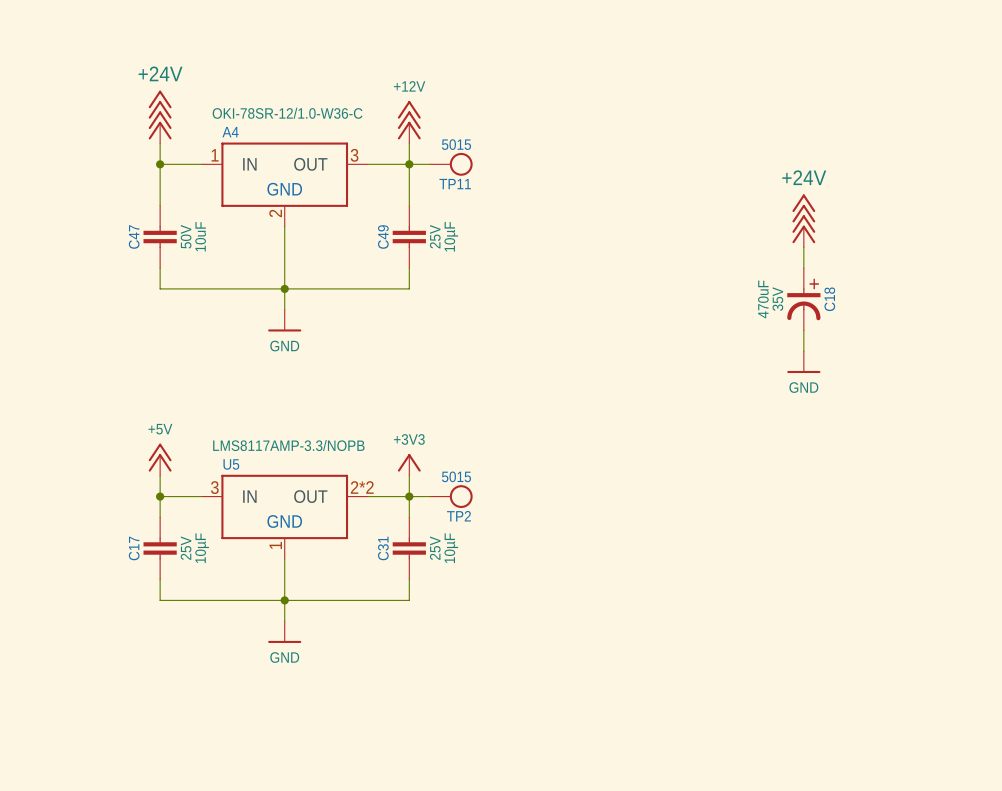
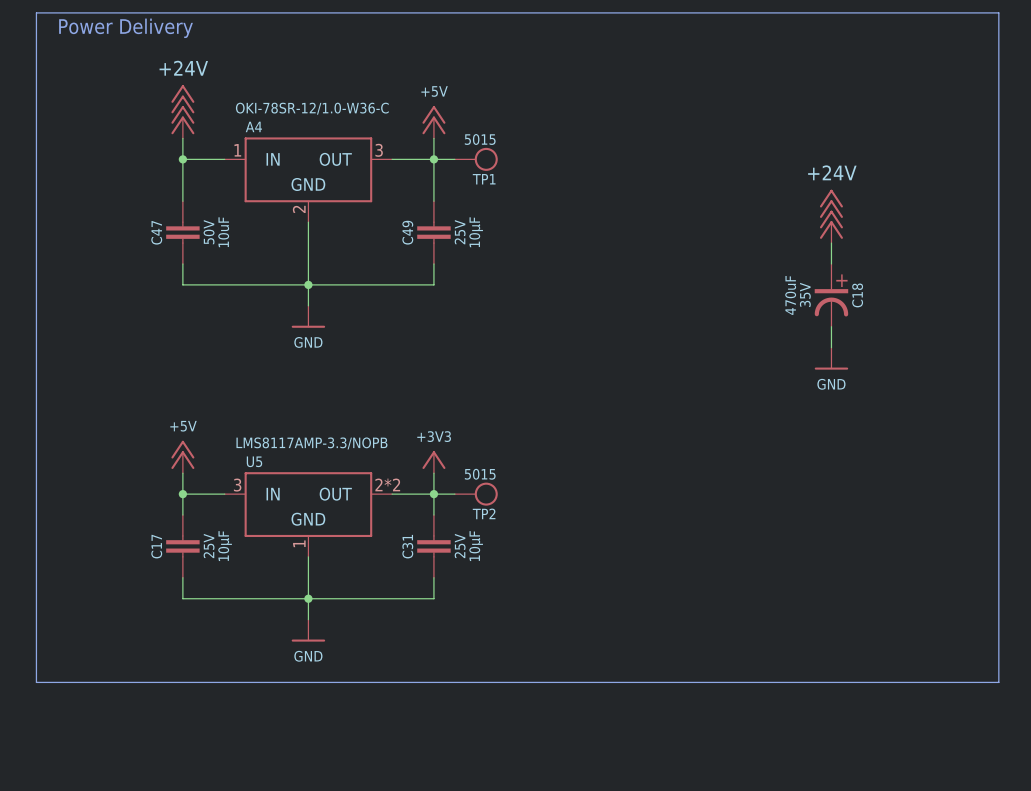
line: none -> (36, 12) (36, 682) (998, 682) (998, 12) (36, 12)
text: none -> Power Delivery (126, 28)
power symbol: +12V (409, 122) -> +5V (433, 122)
TP11 name: TP11 (455, 184) -> TP1 (484, 179)

